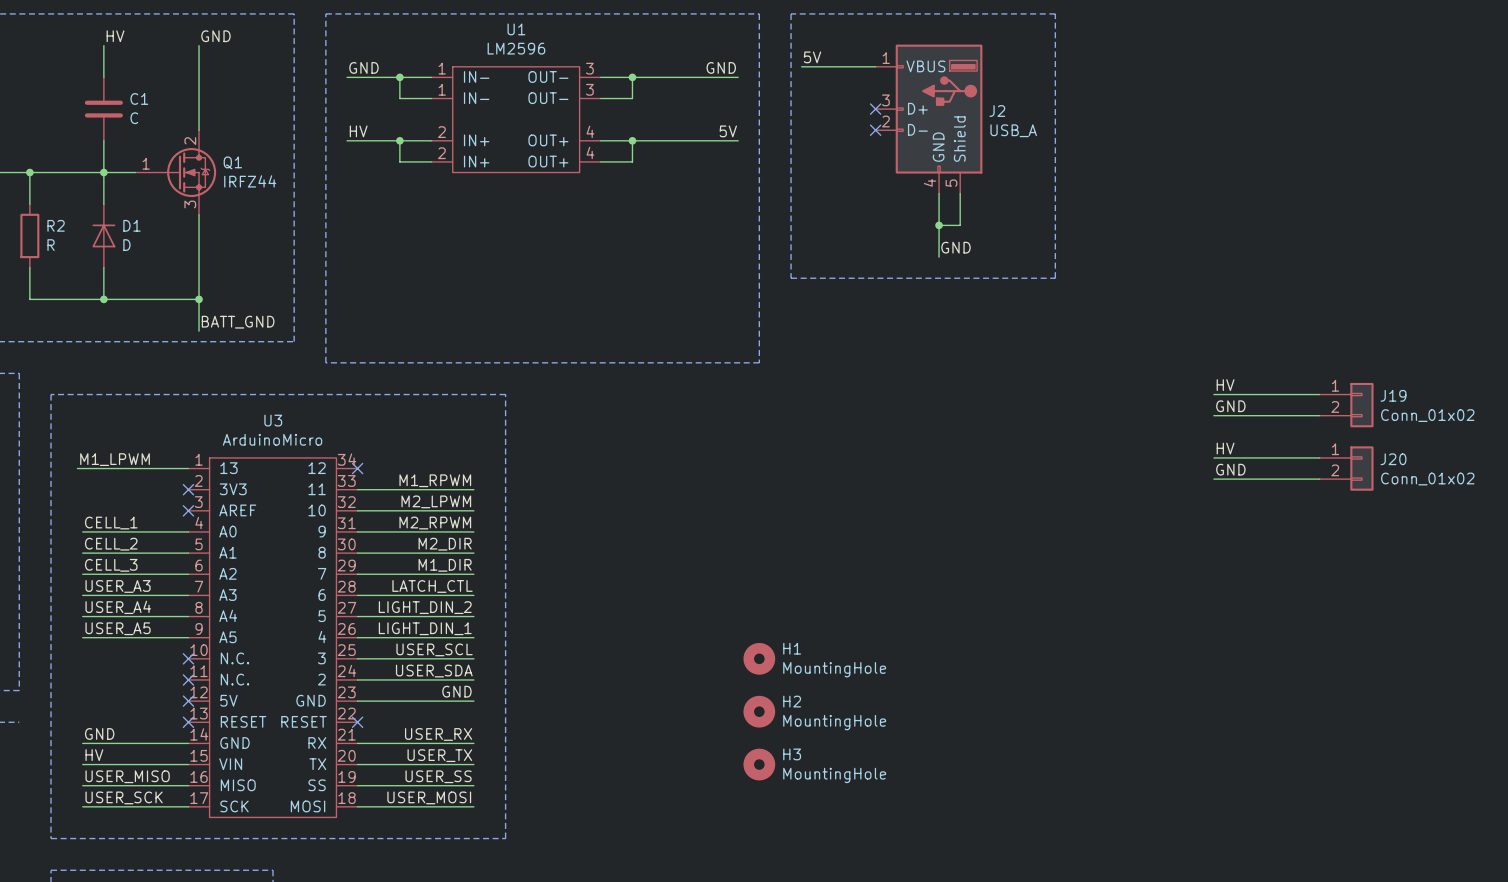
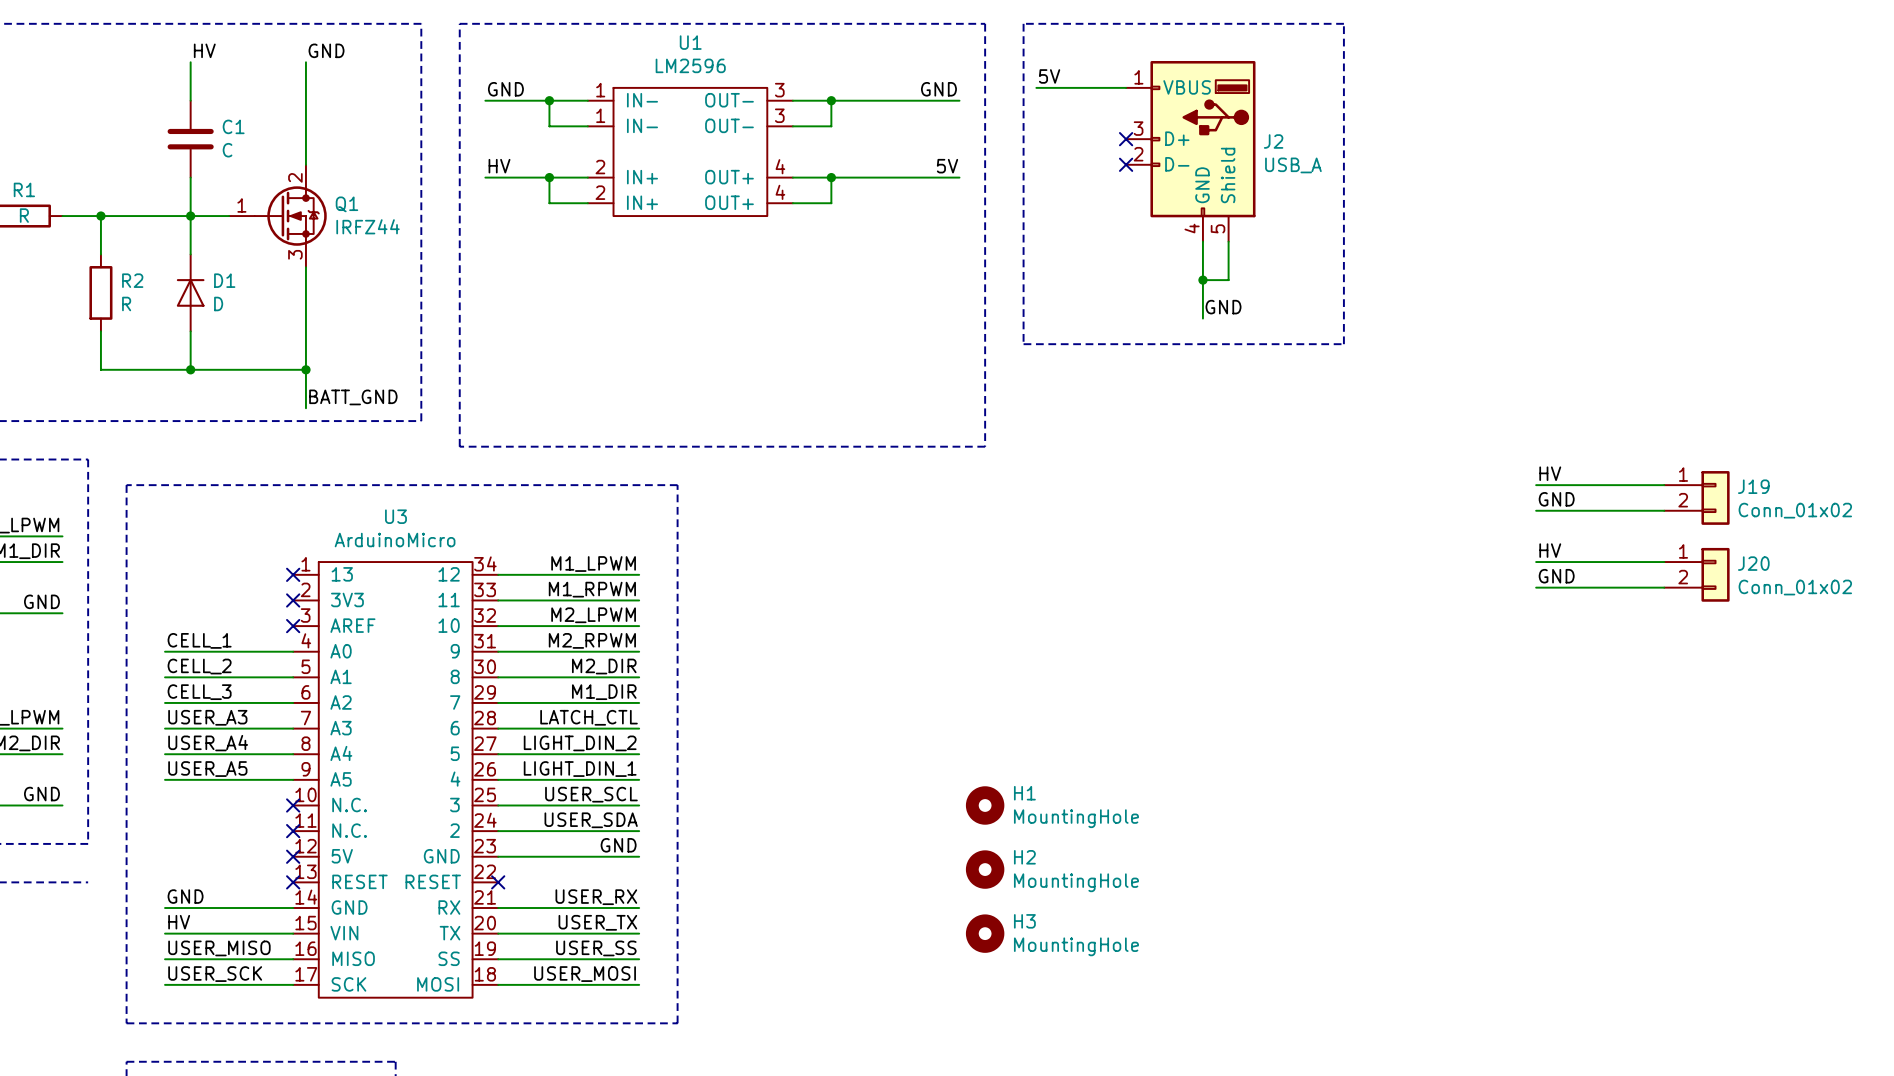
label: M1_LPWM (115, 459) -> none
label: none -> M1_LPWM (593, 564)
wire: (77, 468) (188, 468) -> none
no-connect mark: none -> (293, 574)
wire: none -> (498, 574) (639, 574)
no-connect mark: (357, 468) -> none

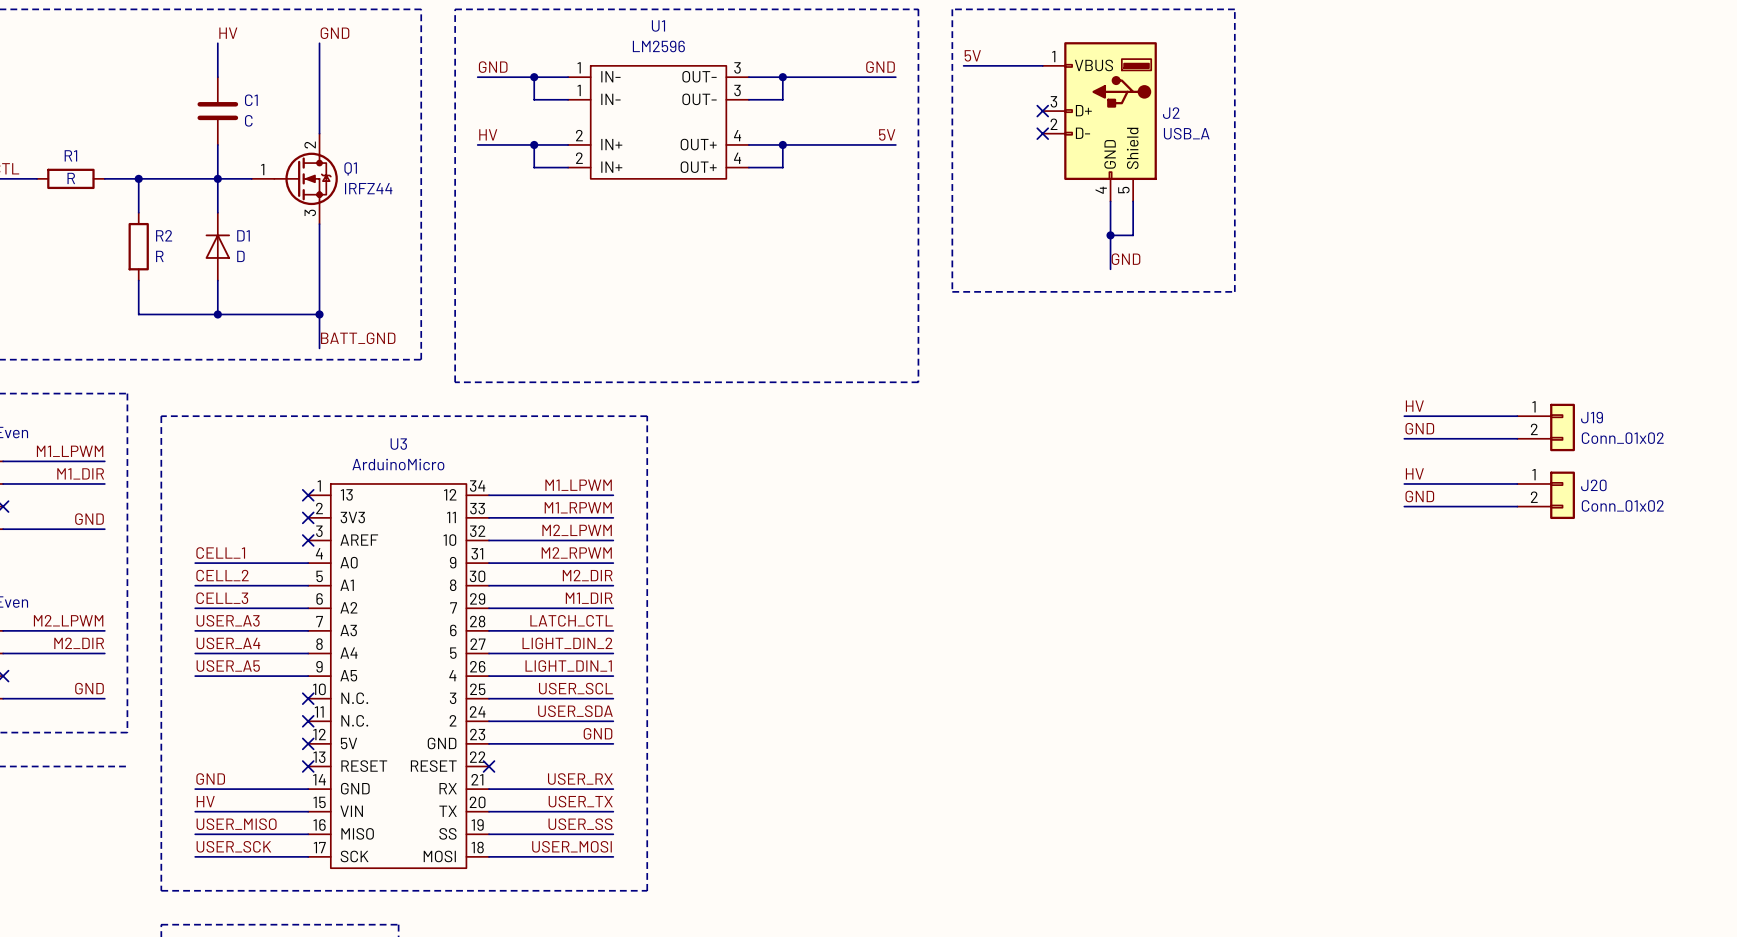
H1: MountingHole (985, 805) -> none
H2: MountingHole (985, 869) -> none
H3: MountingHole (985, 933) -> none

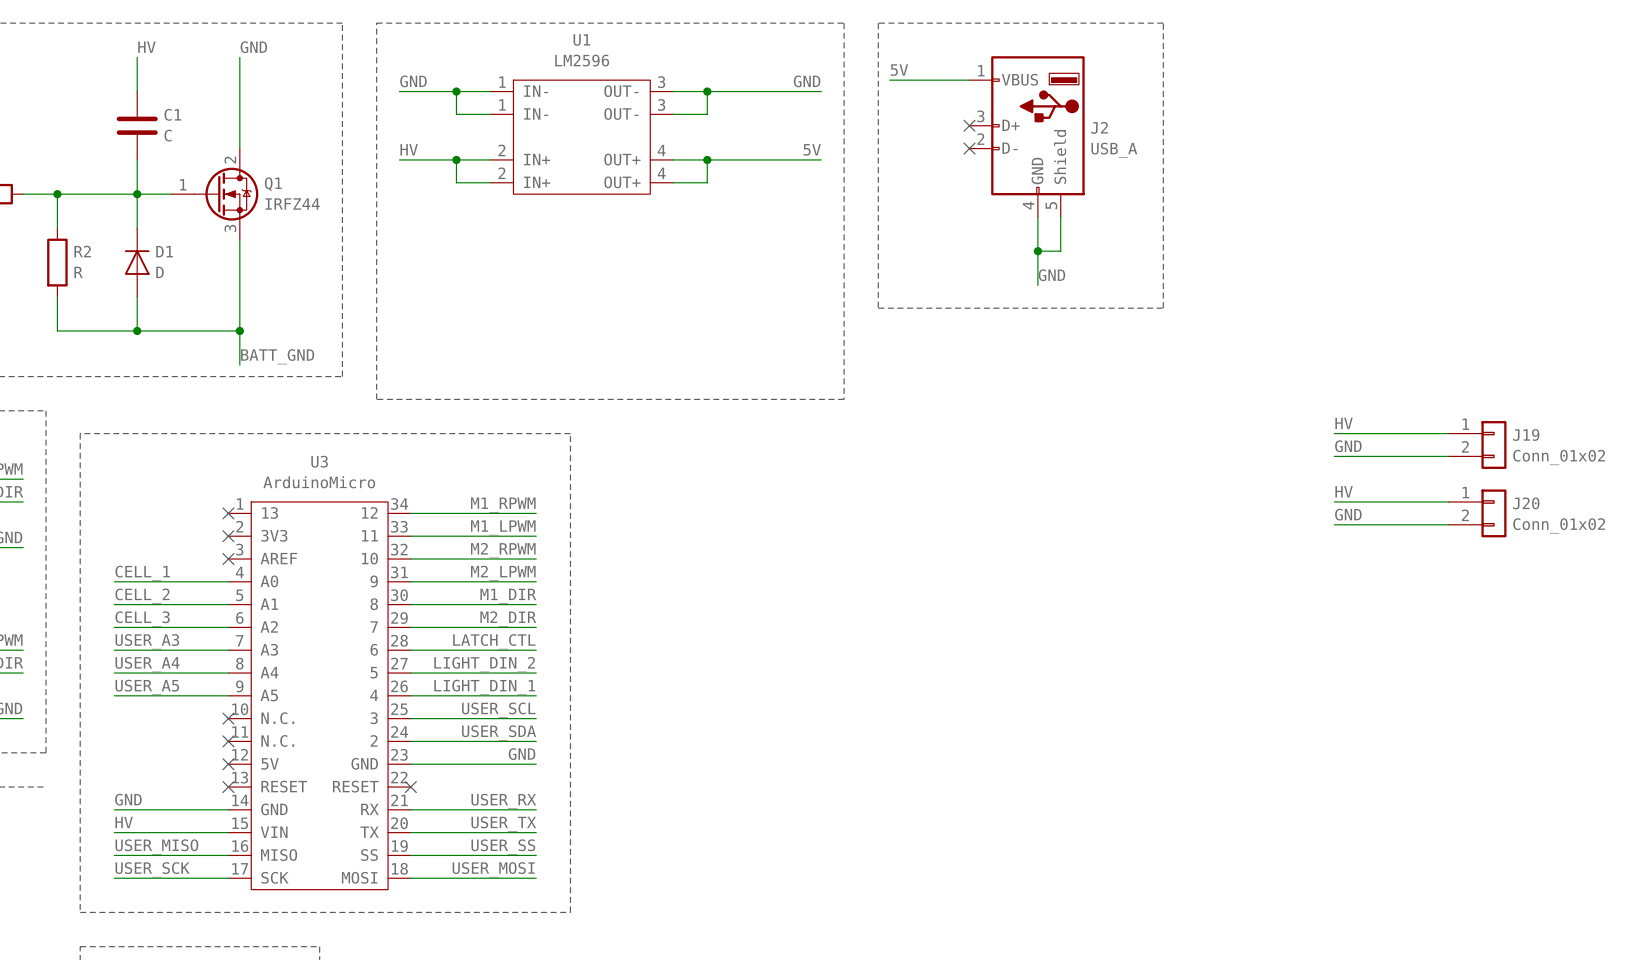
label: M1_LPWM (578, 485) -> M1_RPWM (503, 505)
label: M1_RPWM (578, 507) -> M1_LPWM (503, 527)
label: M2_LPWM (577, 530) -> M2_RPWM (503, 550)
label: M2_RPWM (576, 552) -> M2_LPWM (503, 573)
label: M2_DIR (587, 575) -> M1_DIR (508, 596)
label: M1_DIR (589, 598) -> M2_DIR (508, 618)

